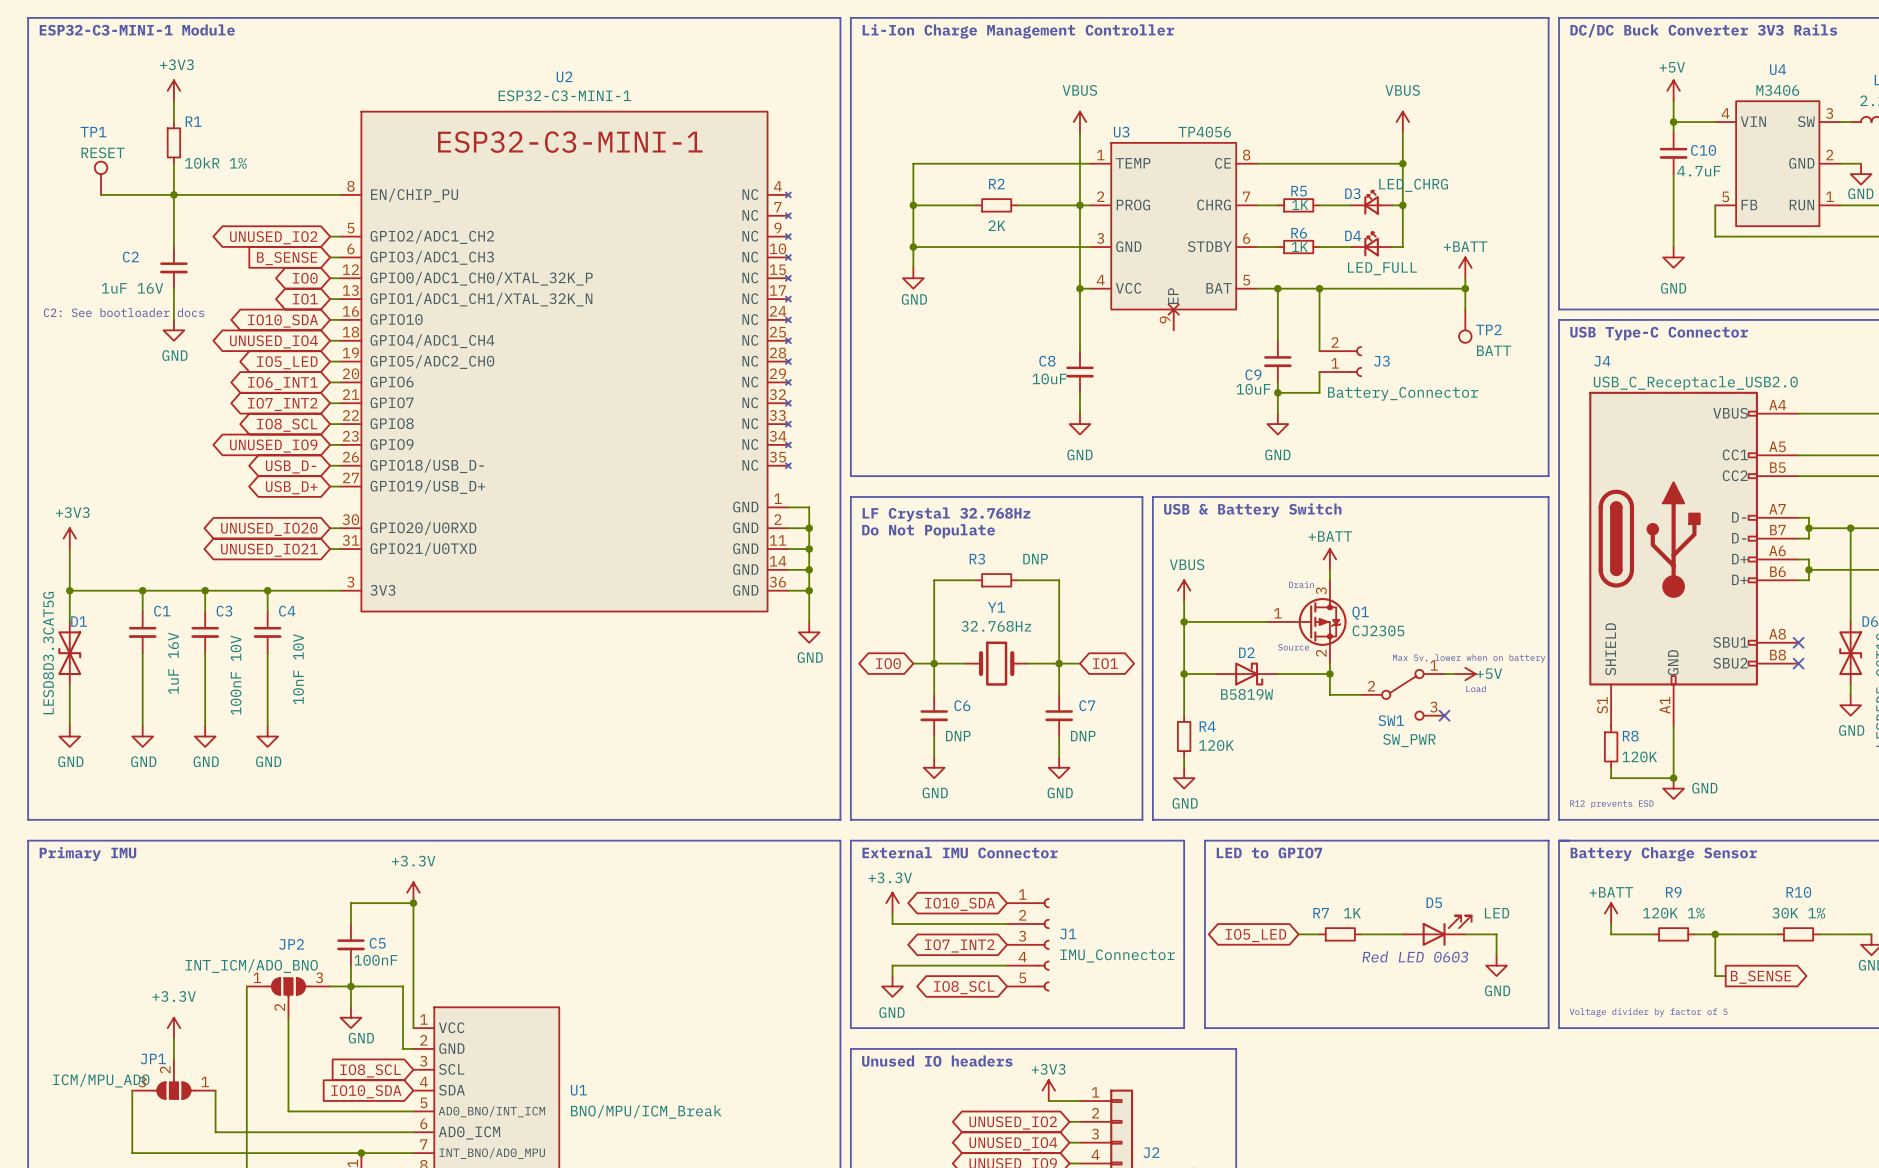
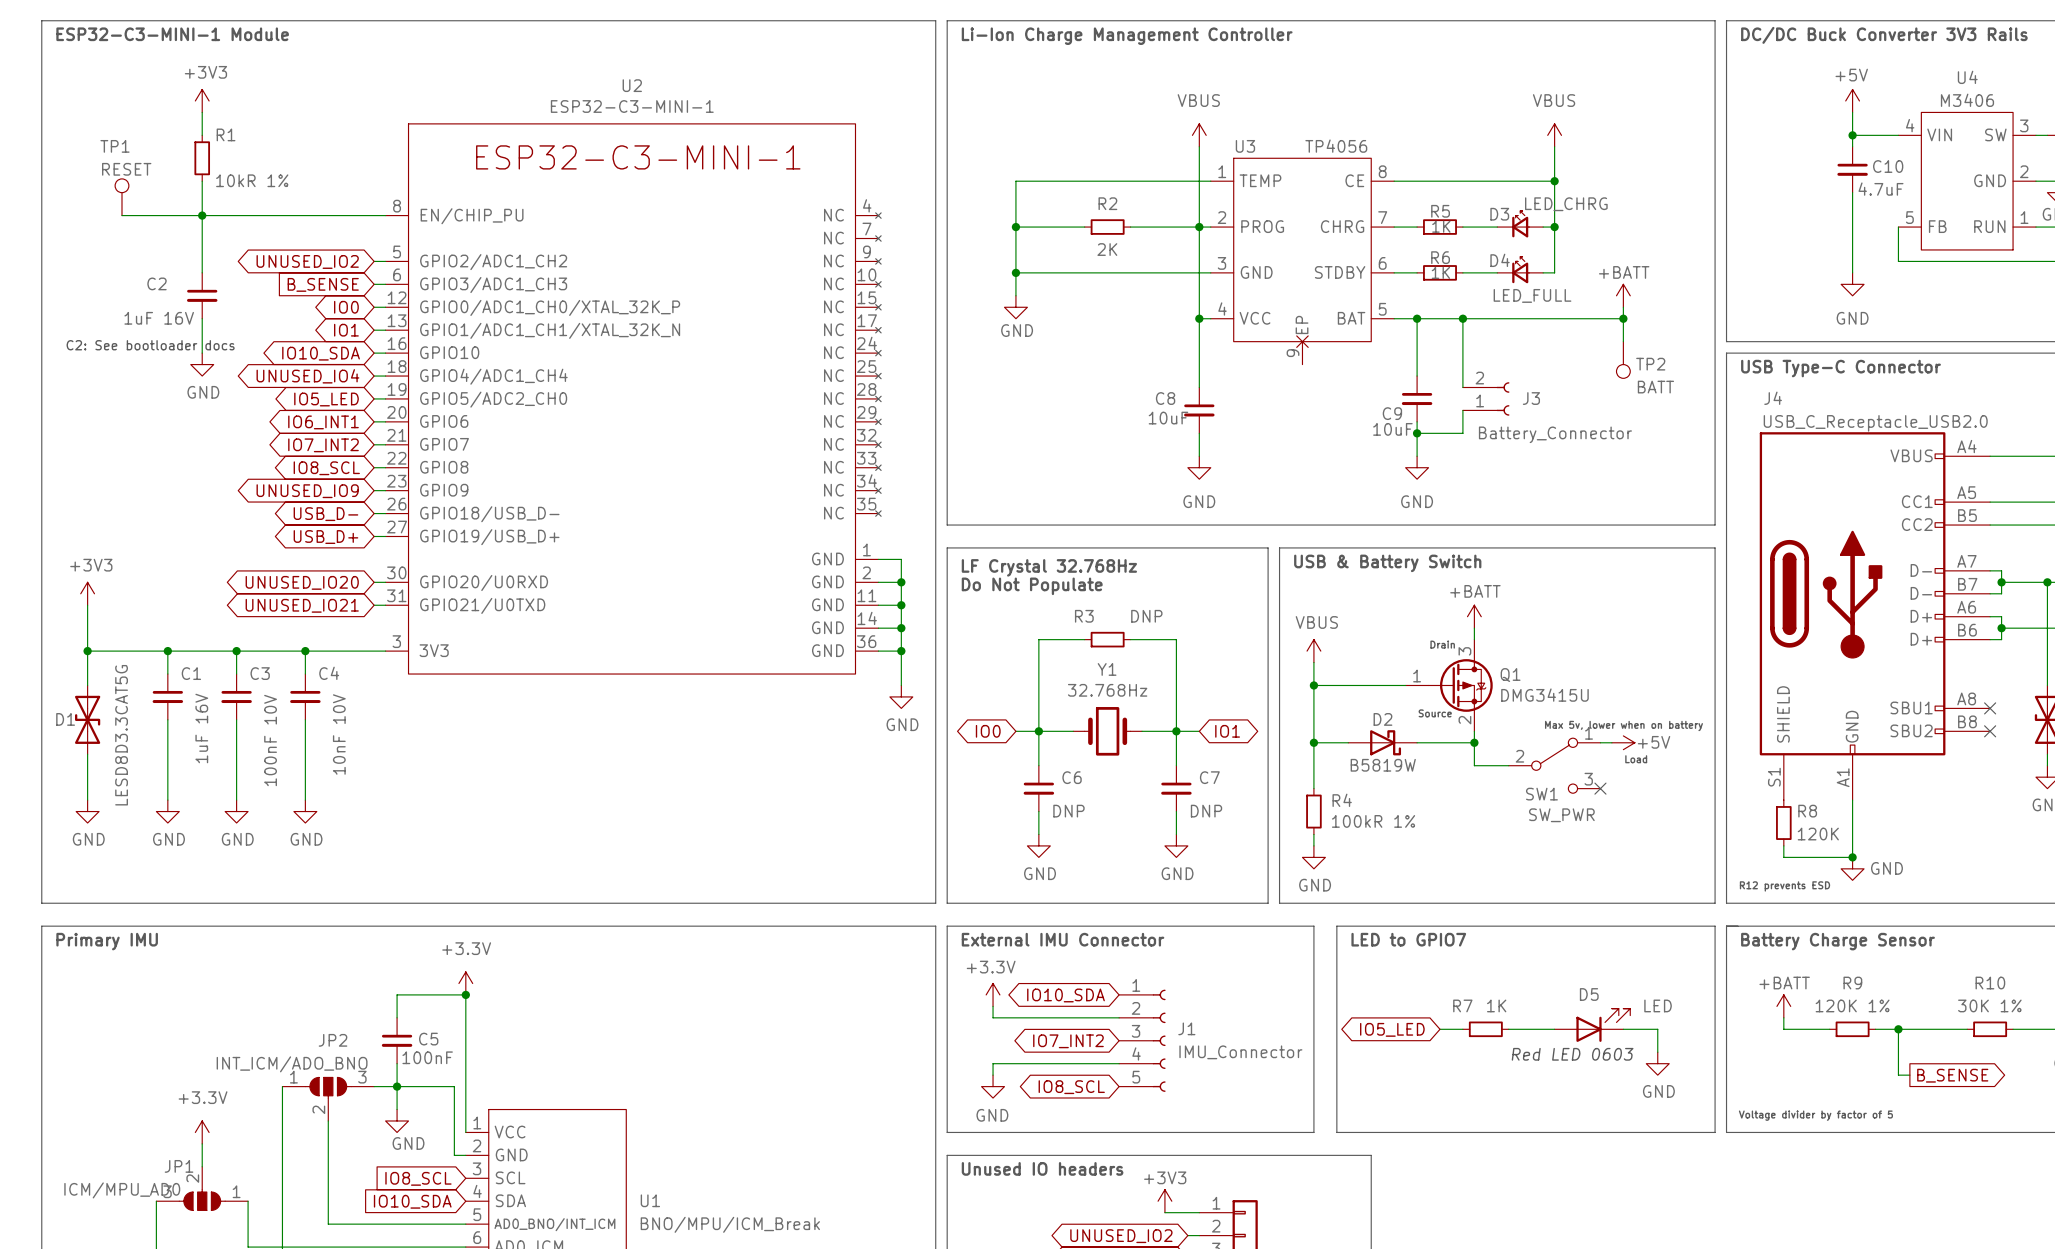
D1 name position: D1 (79, 621) -> D1 (65, 719)
Q1 value: CJ2305 (1378, 630) -> DMG3415U (1544, 695)
D1 value position: LESD8D3.3CAT5G (48, 653) -> LESD8D3.3CAT5G (121, 735)
R4 value: 120K (1216, 745) -> 100kR 1% (1373, 821)

